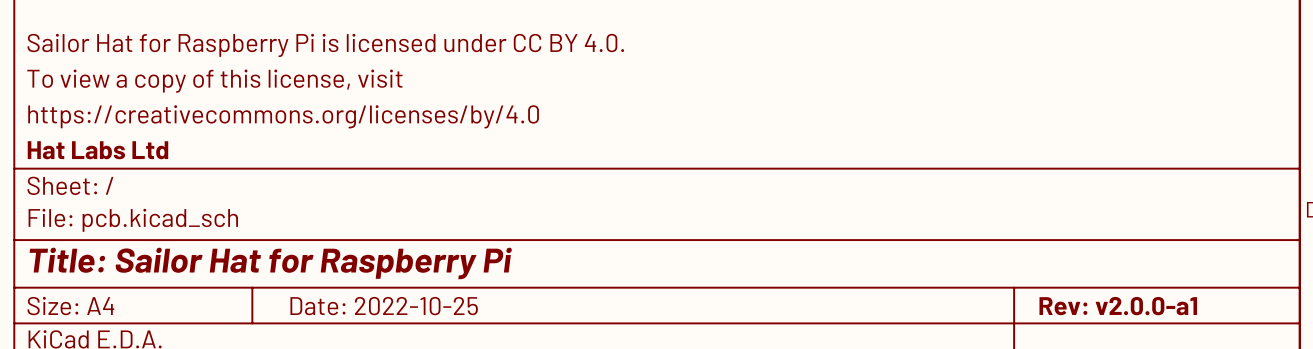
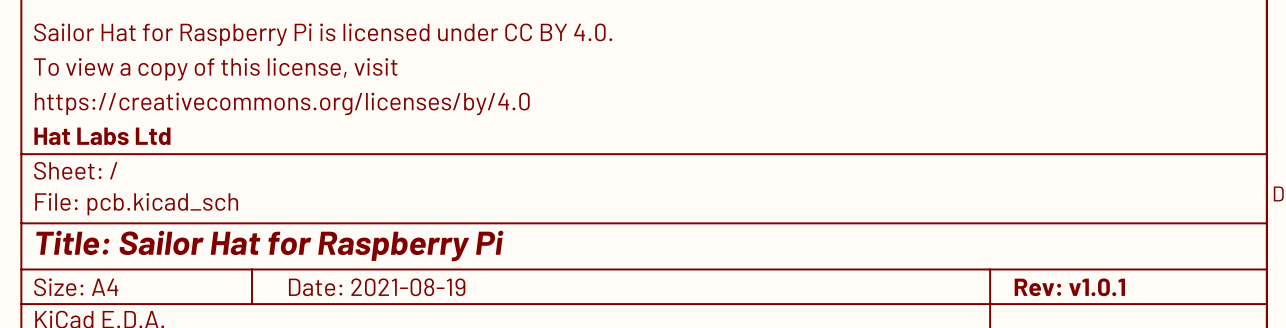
title block: Date: 2022-10-25 (384, 306) -> Date: 2021-08-19 (377, 287)
title block: Rev: v2.0.0-a1 (1118, 306) -> Rev: v1.0.1 (1069, 287)

